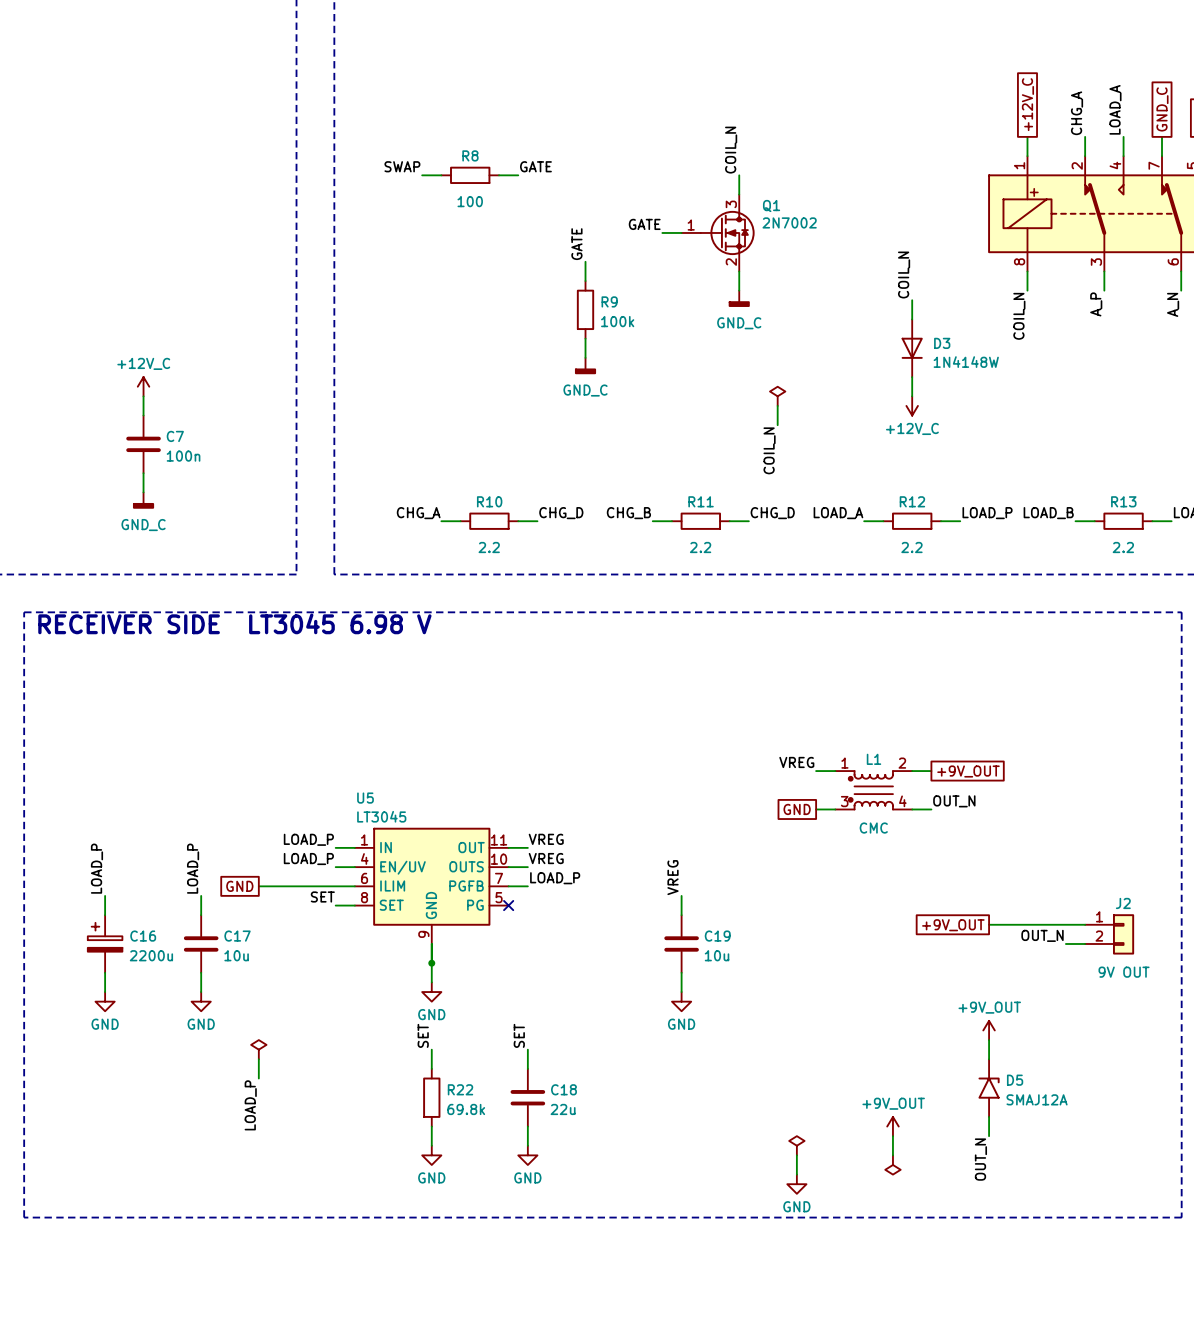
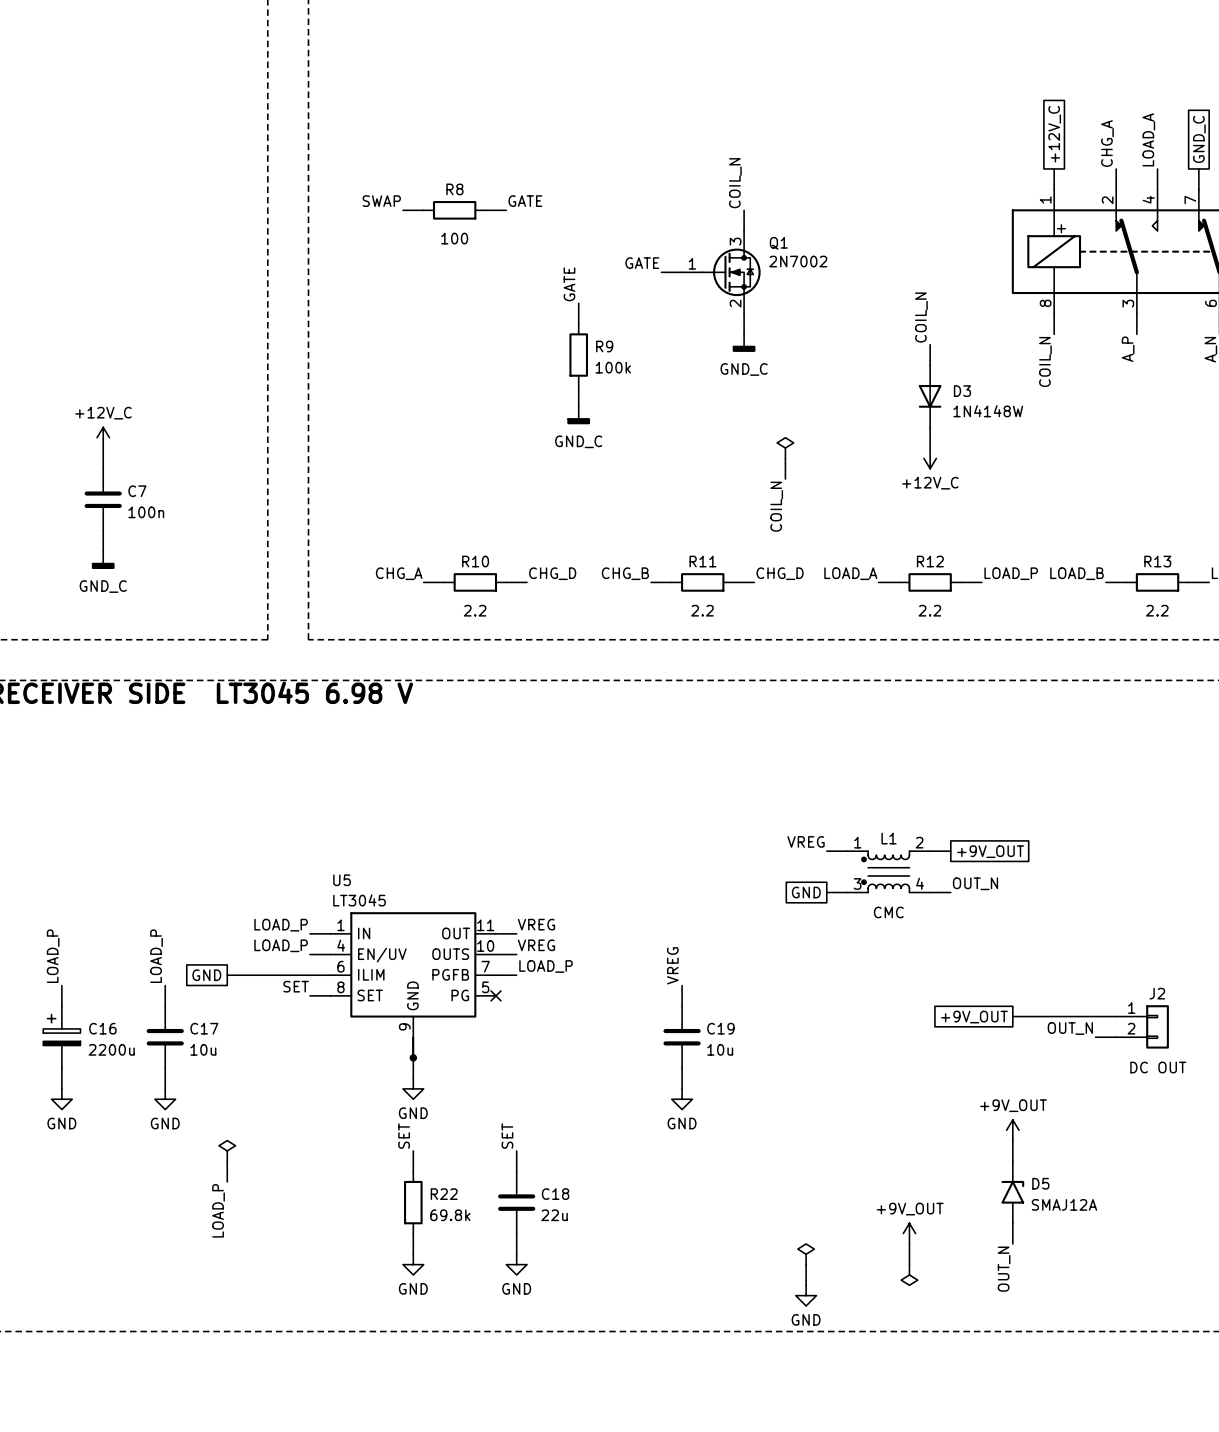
J2 value: 9V OUT (1124, 972) -> DC OUT (1158, 1067)

